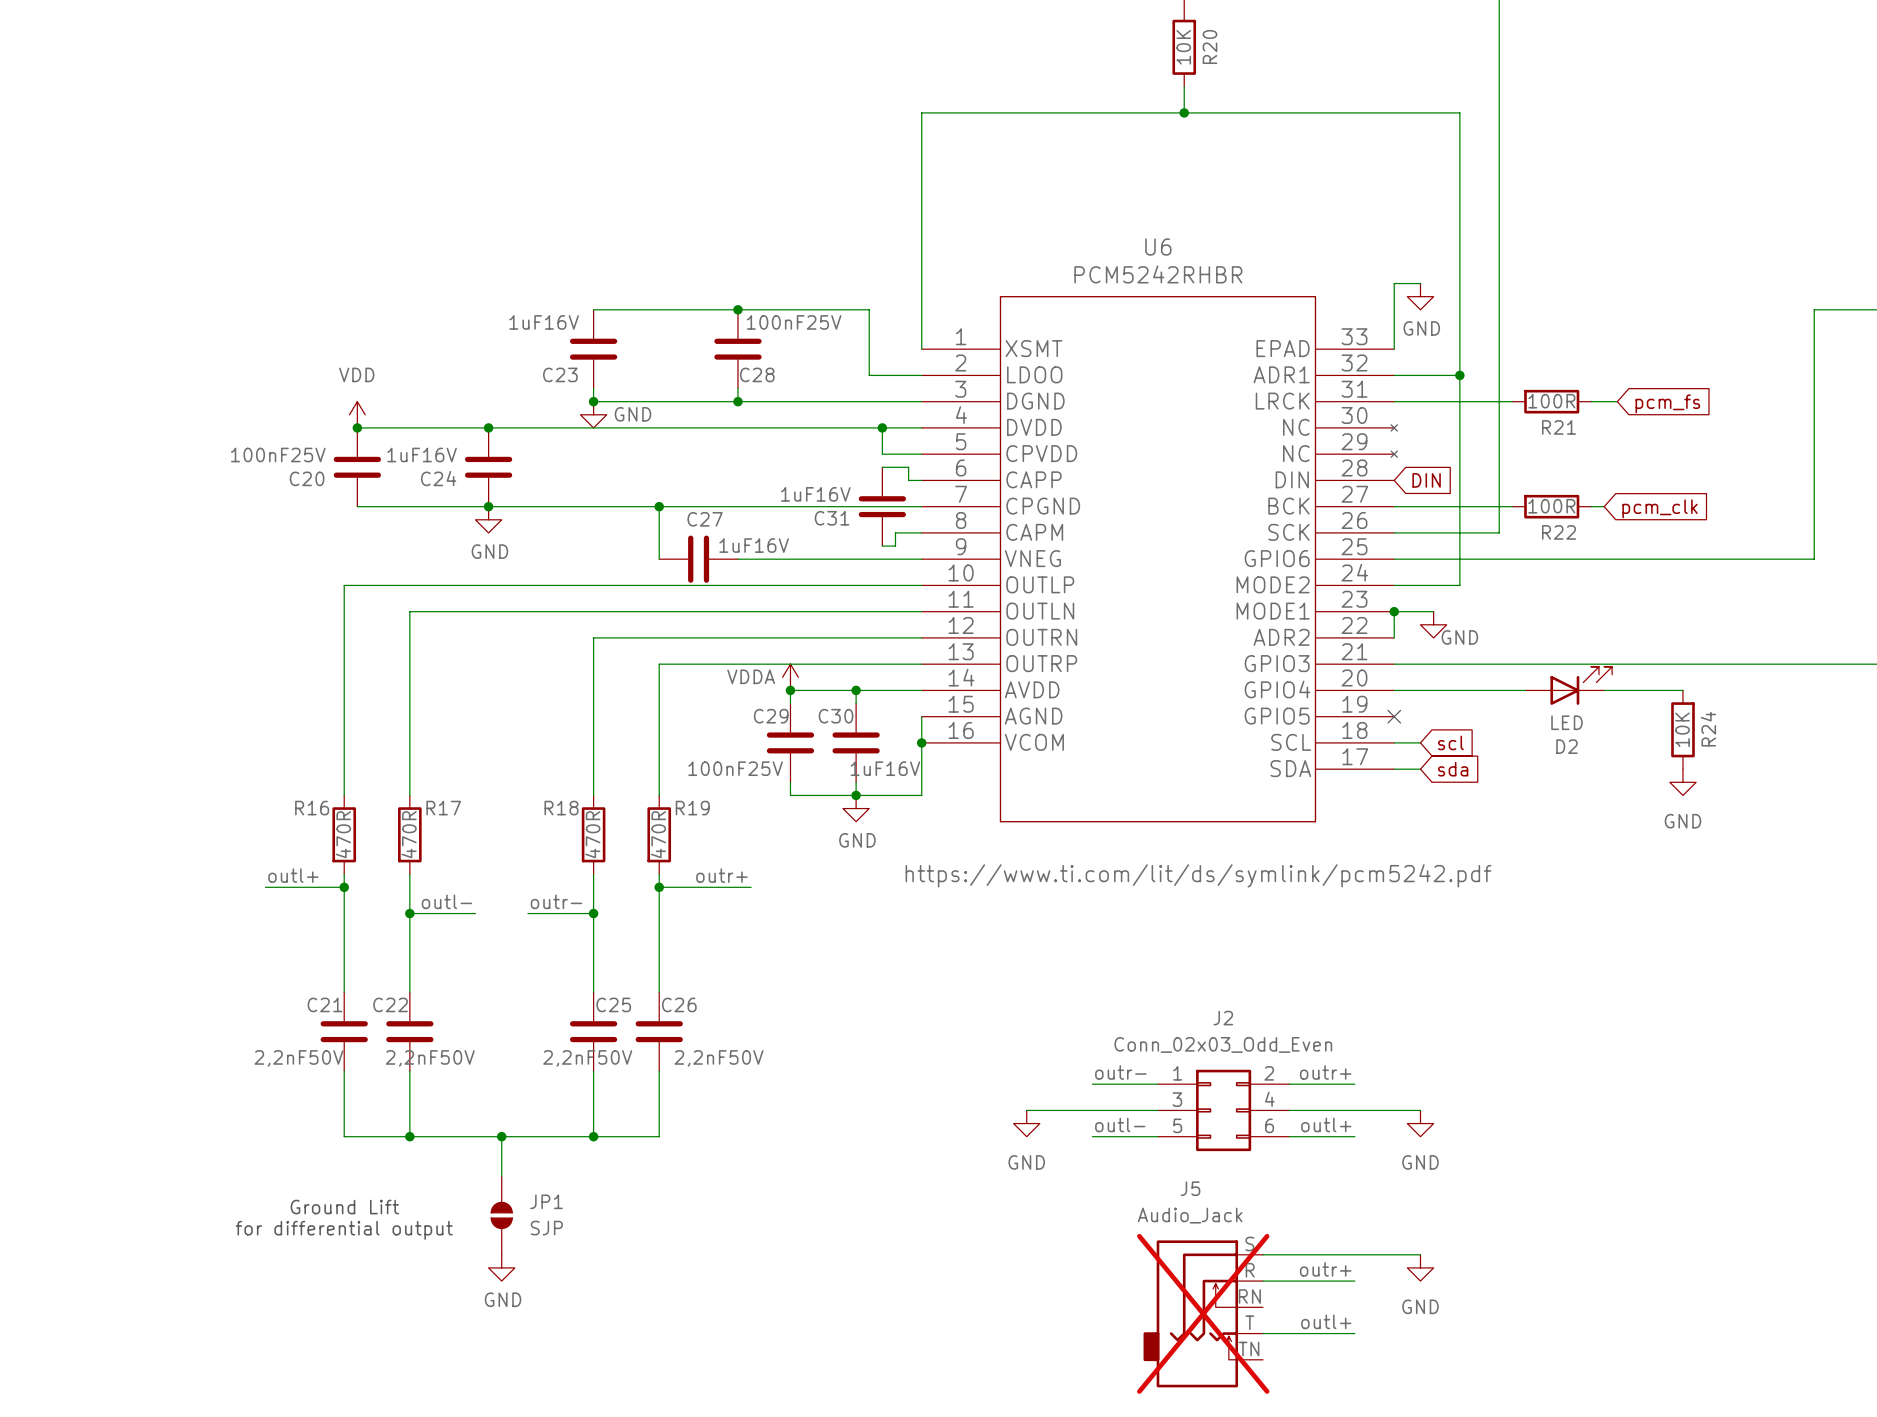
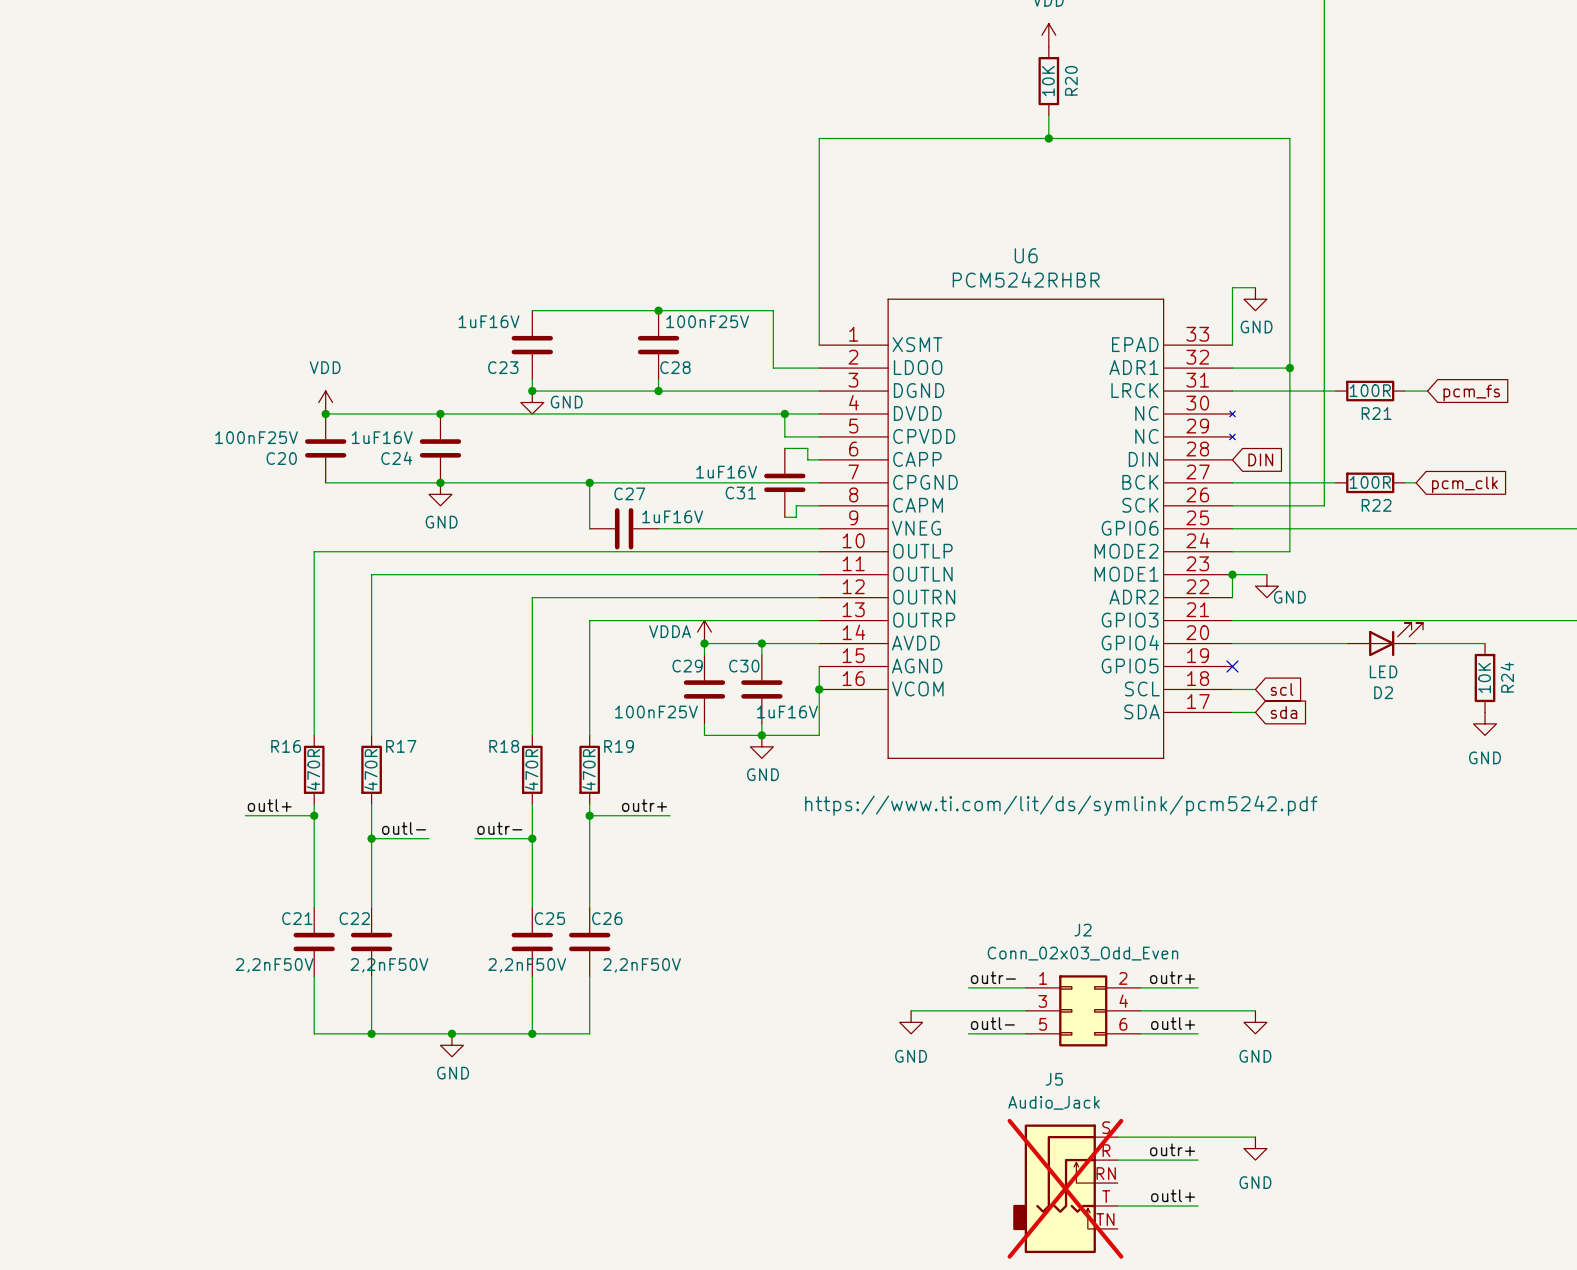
wire: (501, 1136) (501, 1176) -> none
text: Ground Lift (344, 1207) -> none
JP1: SJP (501, 1215) -> none
text: for differential output (344, 1230) -> none
power symbol position: GND (501, 1267) -> GND (451, 1045)

